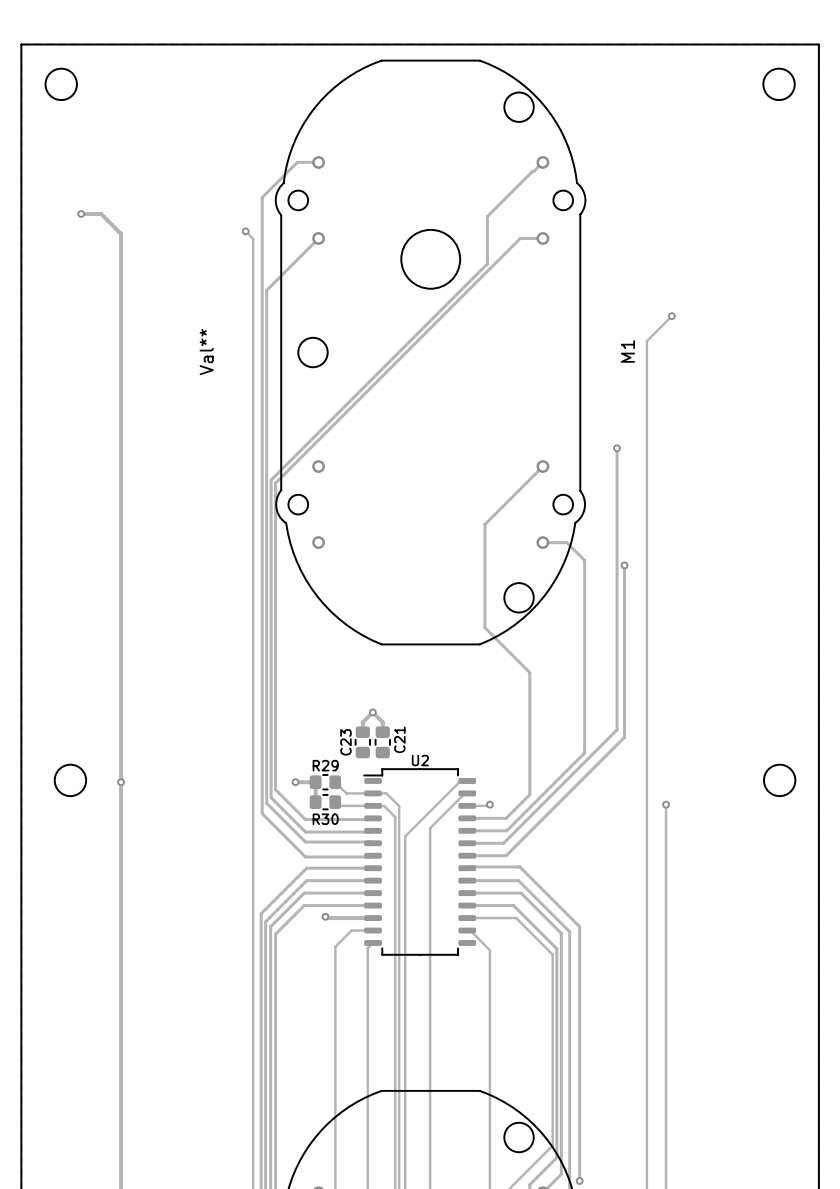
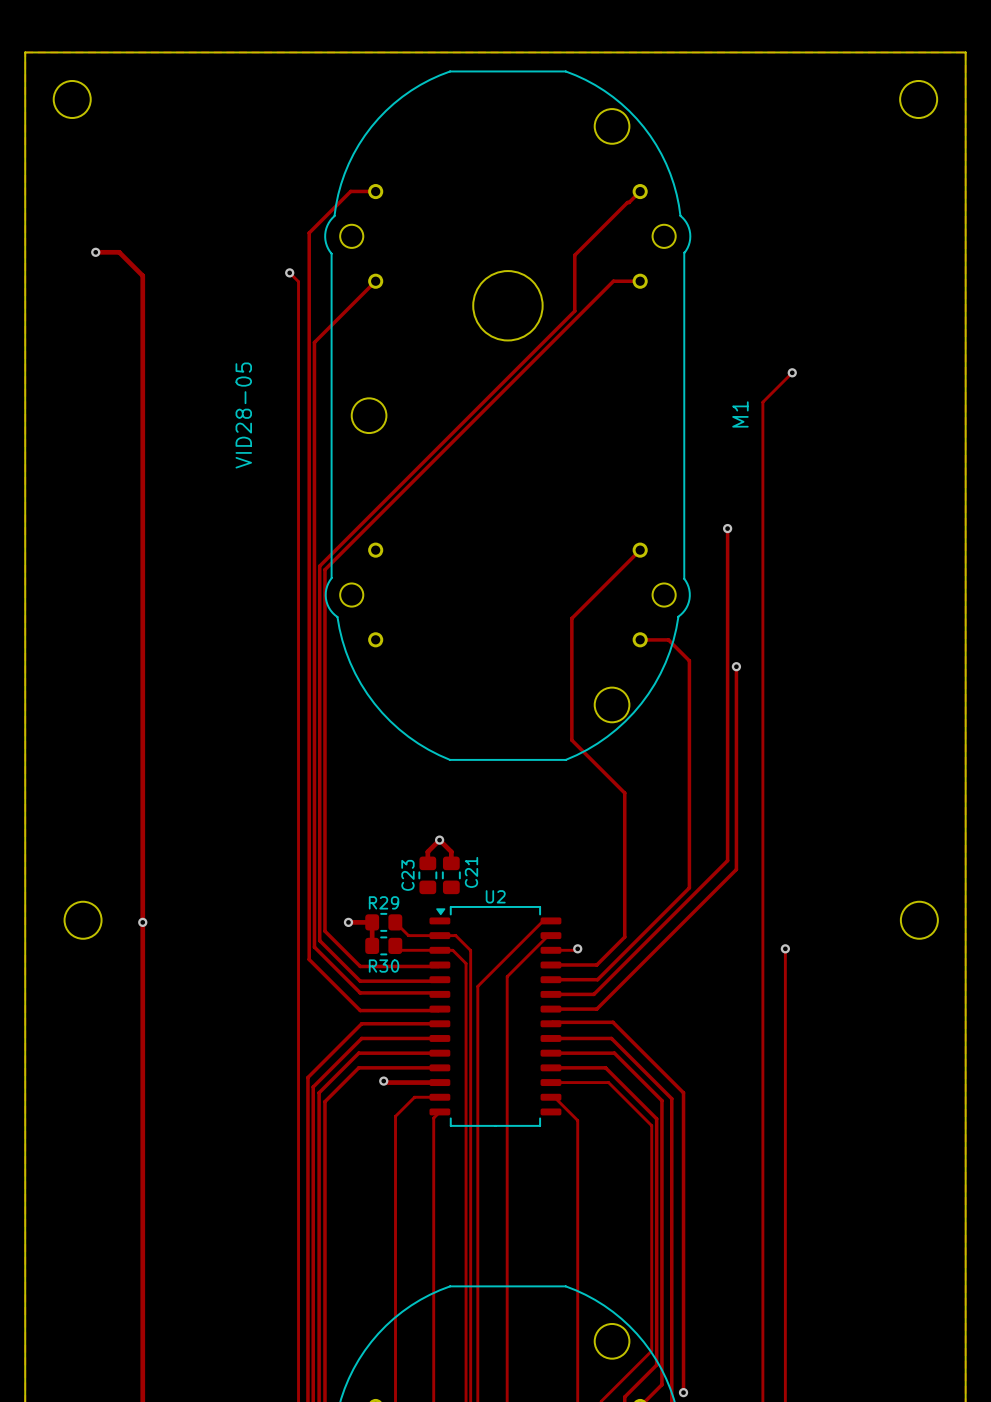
M1 value: Val** (206, 352) -> VID28-05 (243, 415)
U2 footprint: [363, 768, 477, 956] -> [429, 906, 562, 1127]

